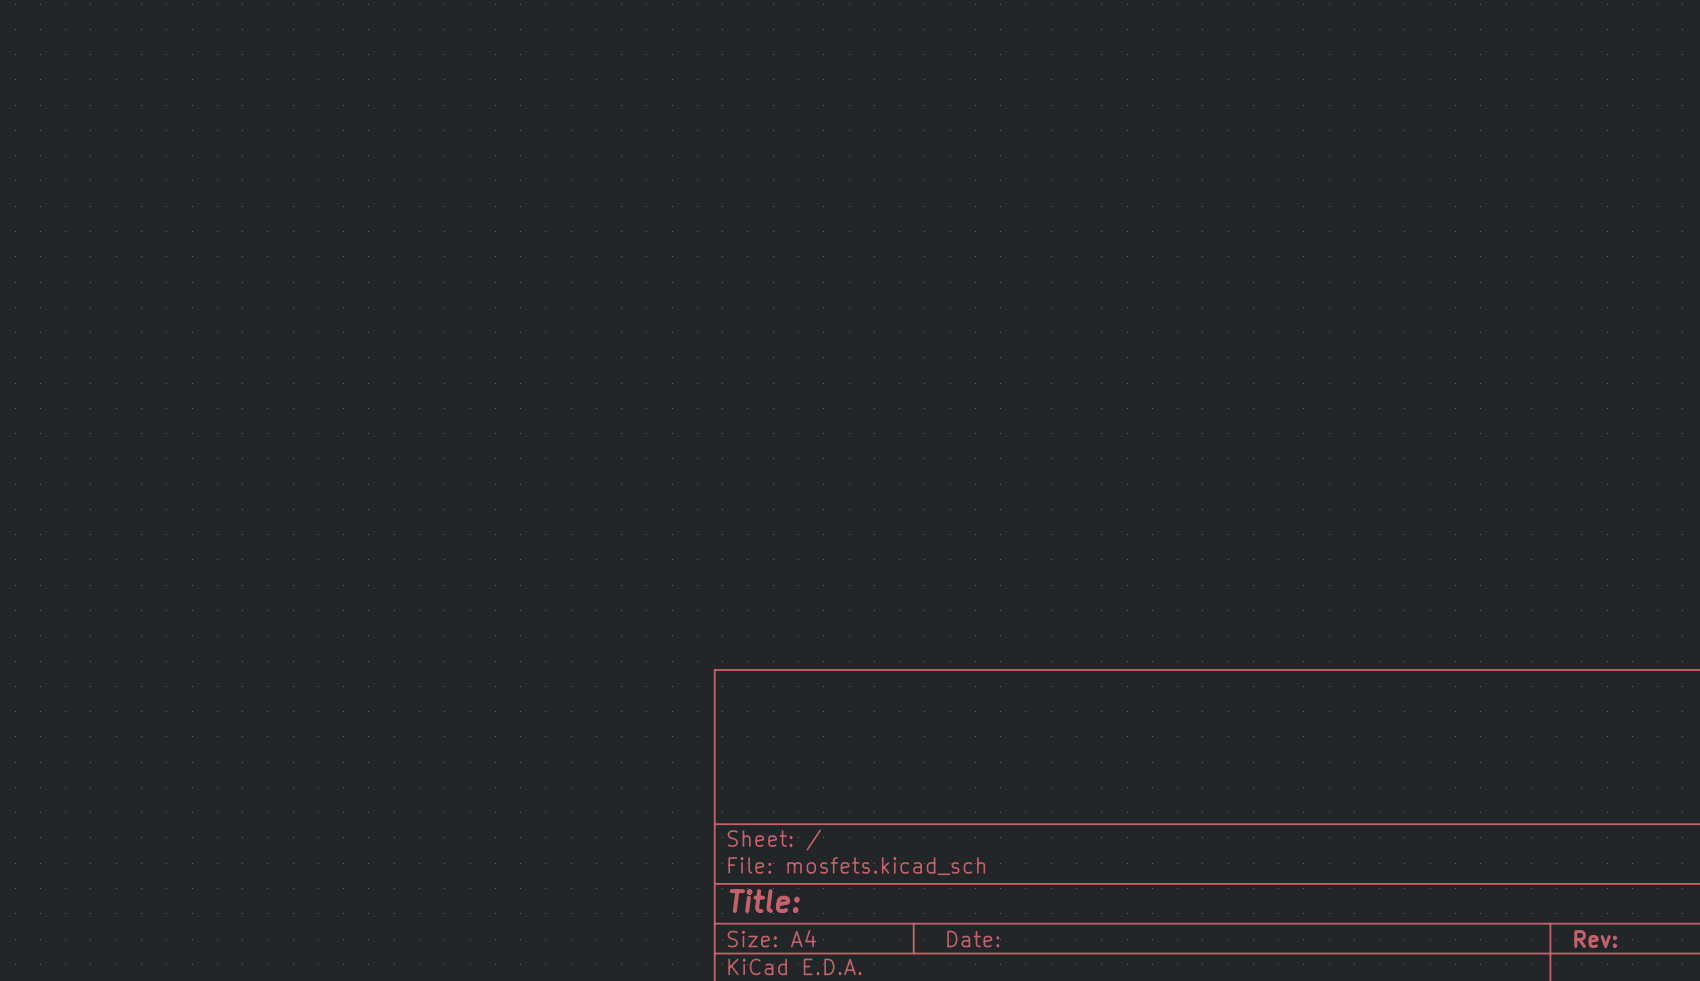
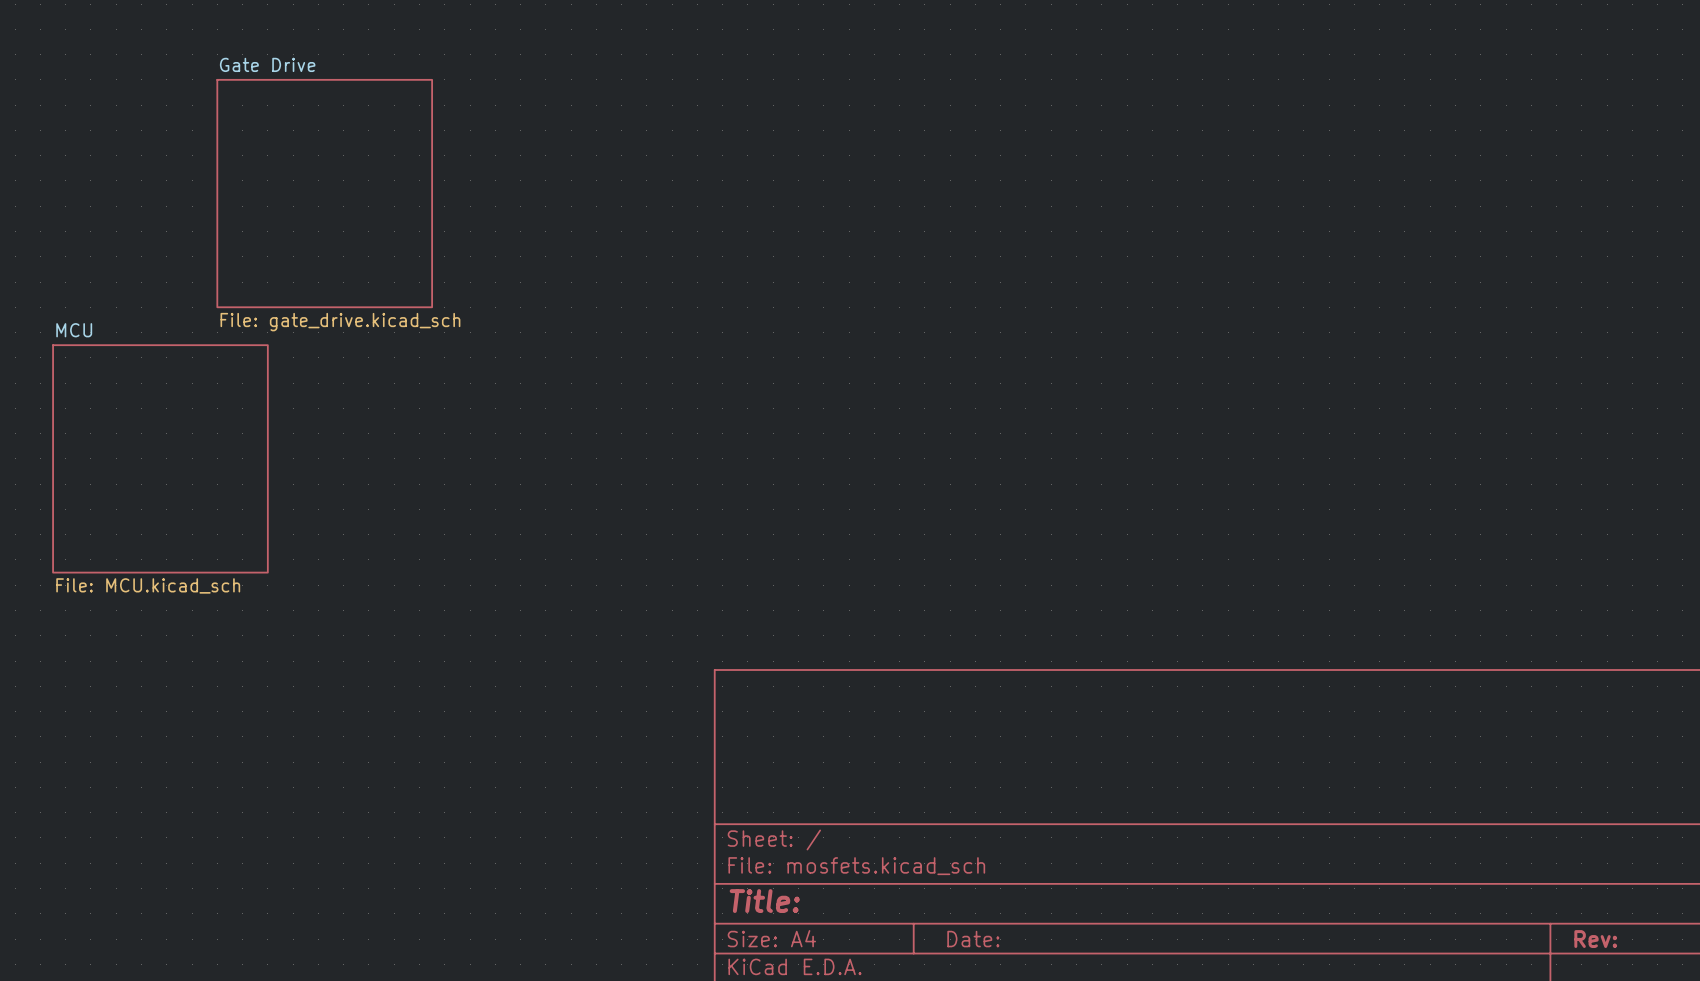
sheet Gate Drive: none -> File: gate_drive.kicad_sch (324, 193)
sheet MCU: none -> File: MCU.kicad_sch (160, 458)

